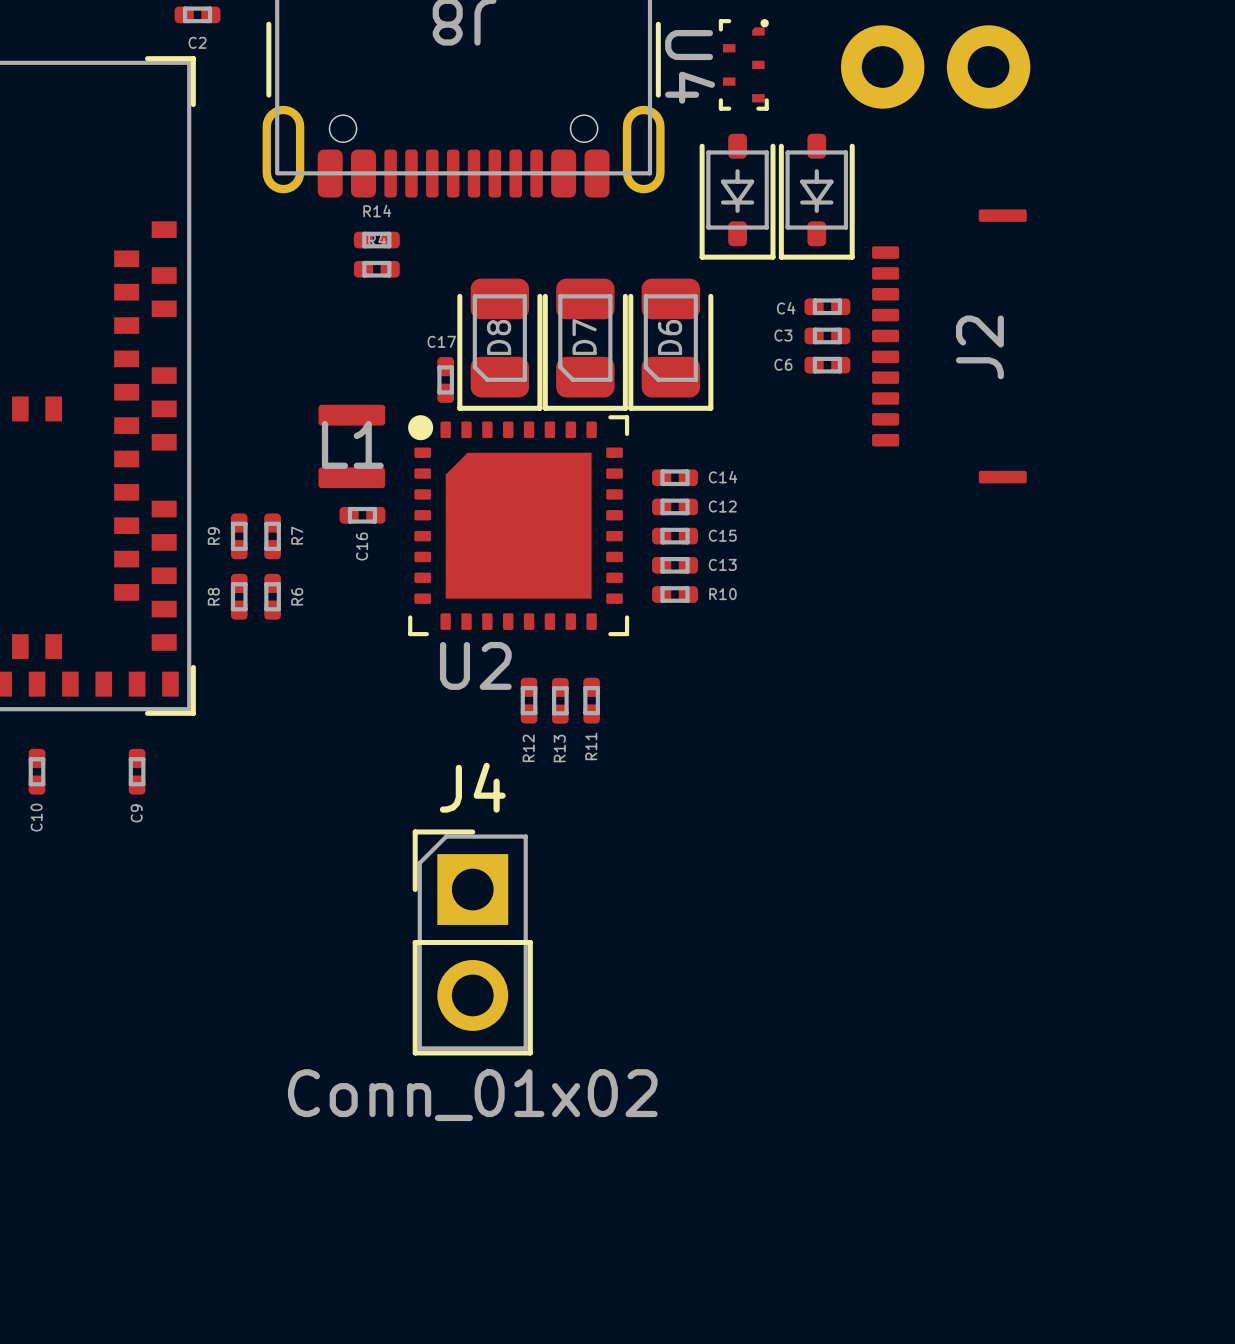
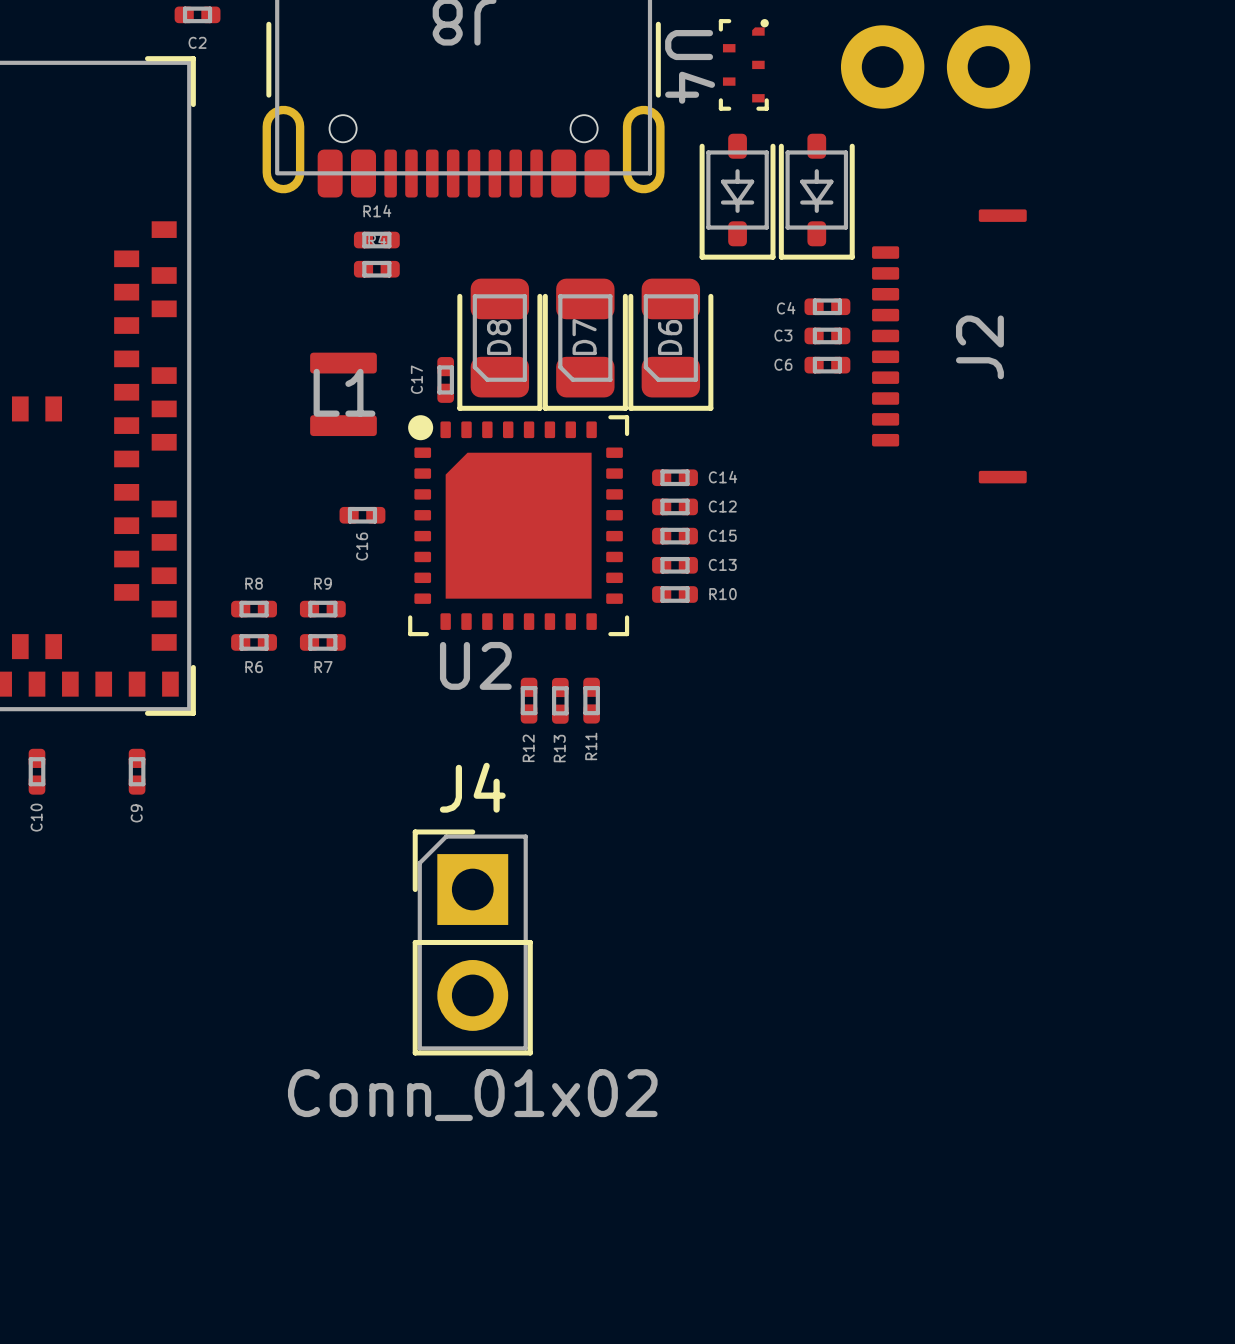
C17 name rotation: 0° (441, 341) -> 90° counterclockwise (416, 379)
C17 name position: C17 (441, 341) -> C17 (416, 379)
L1 position: (351, 446) -> (343, 394)
R9 rotation: 0° (239, 536) -> 90° clockwise (322, 609)
R9 position: (239, 536) -> (322, 609)
R7 rotation: 0° (272, 536) -> 90° clockwise (322, 642)
R7 position: (272, 536) -> (322, 642)
R8 rotation: 0° (239, 596) -> 90° clockwise (254, 609)
R6 rotation: 0° (272, 596) -> 90° clockwise (254, 642)
R6 position: (272, 596) -> (254, 642)

